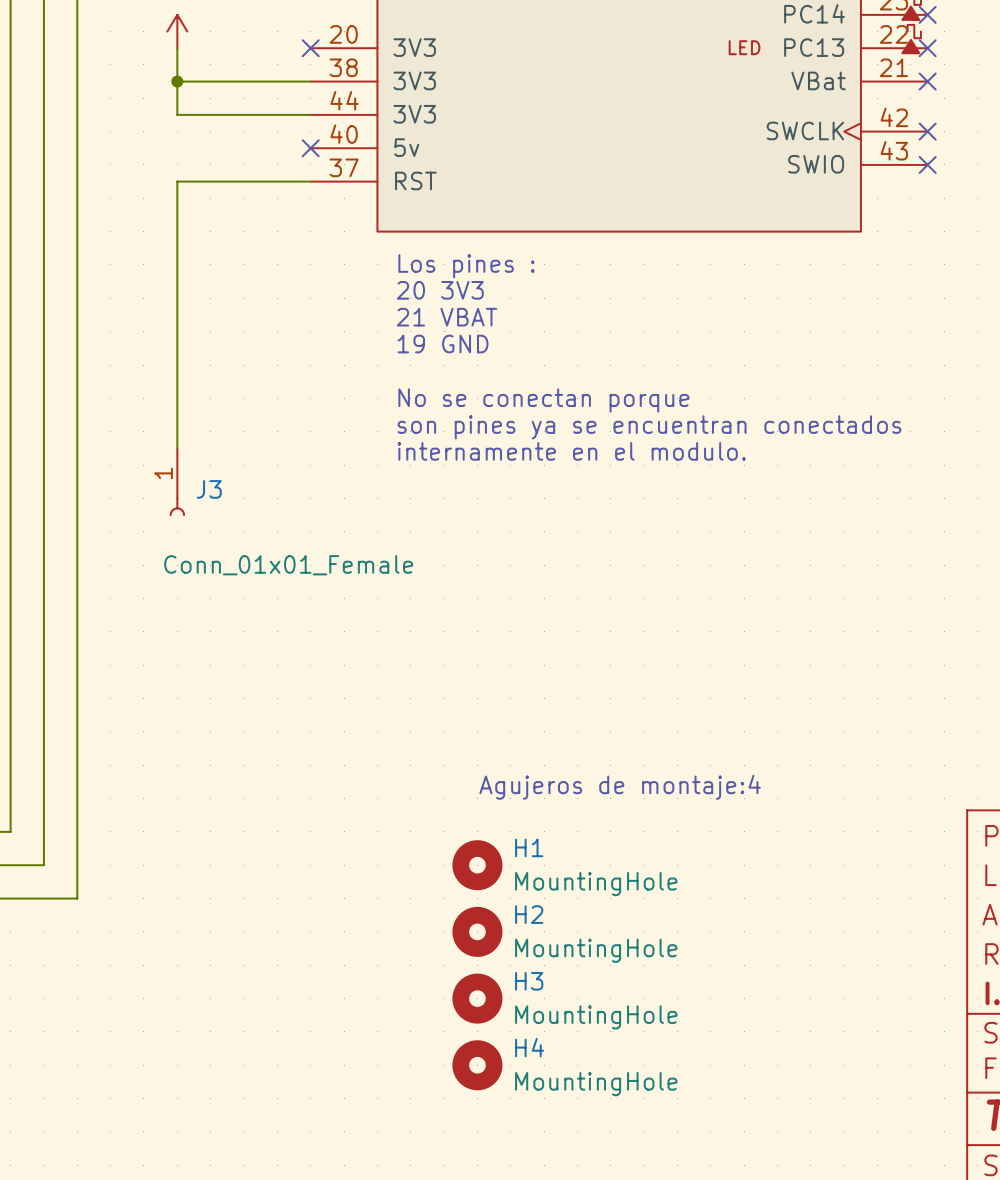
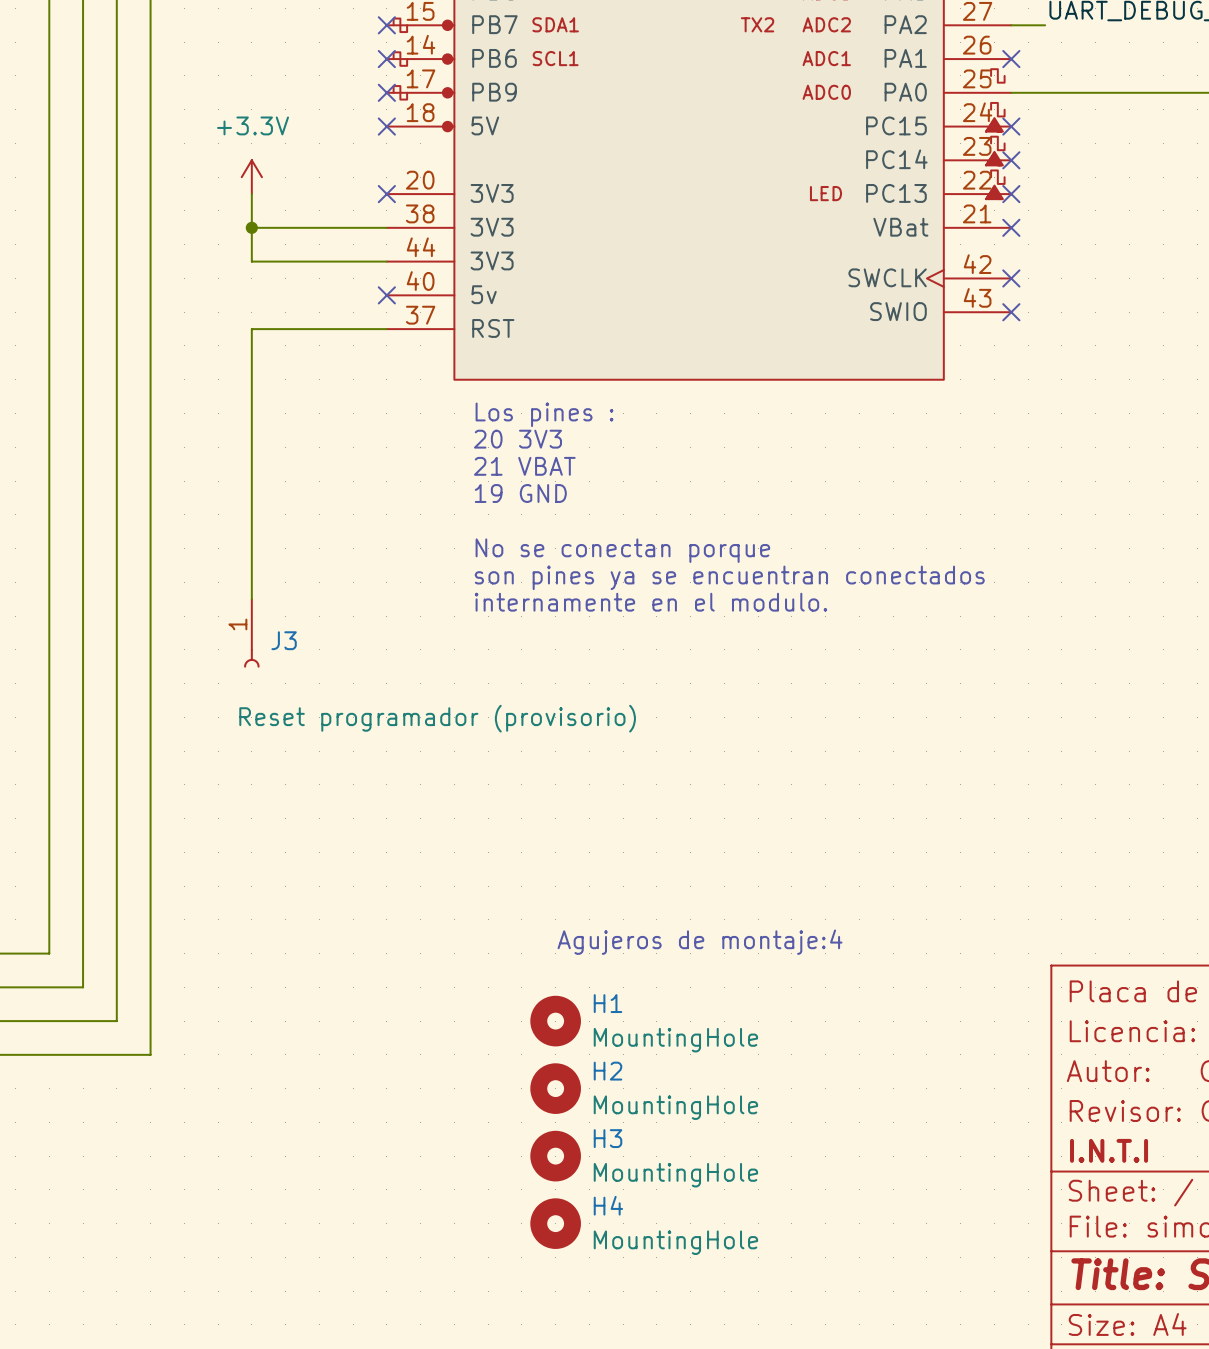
J3 value: Conn_01x01_Female (288, 565) -> Reset programador (provisorio) (437, 718)

